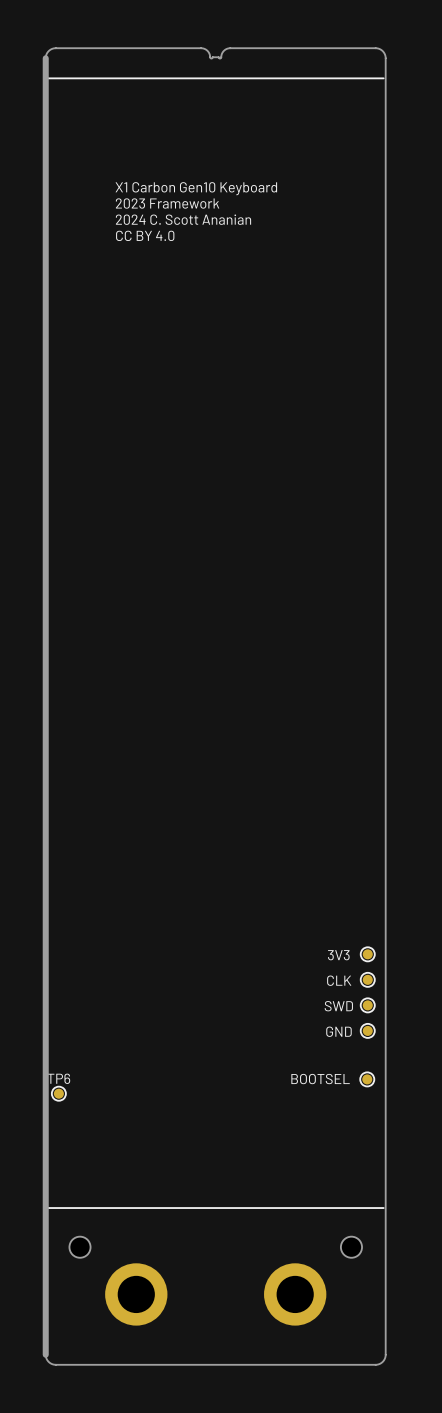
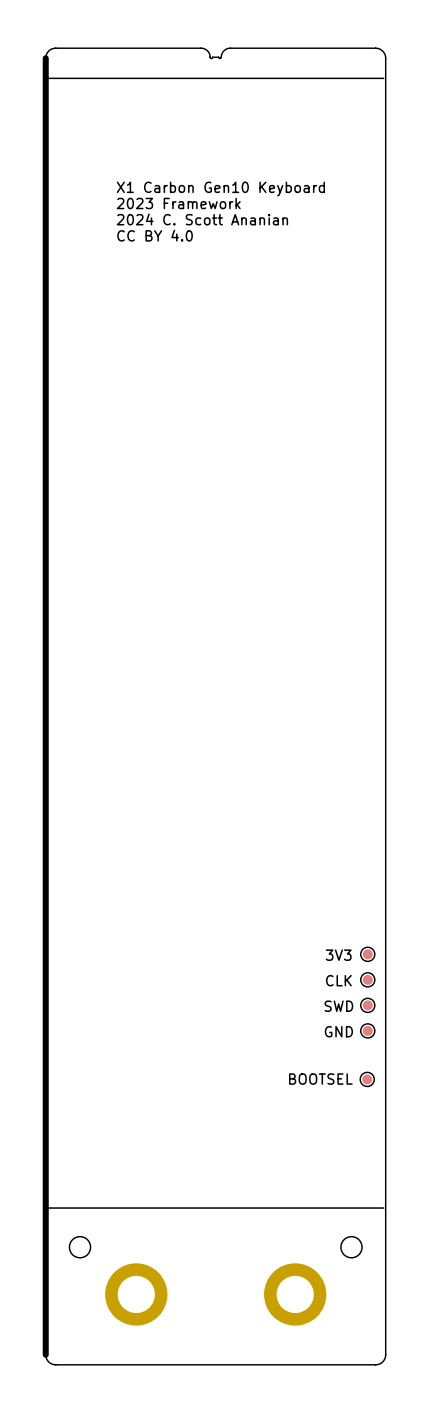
TP6: (58, 1093) -> none

